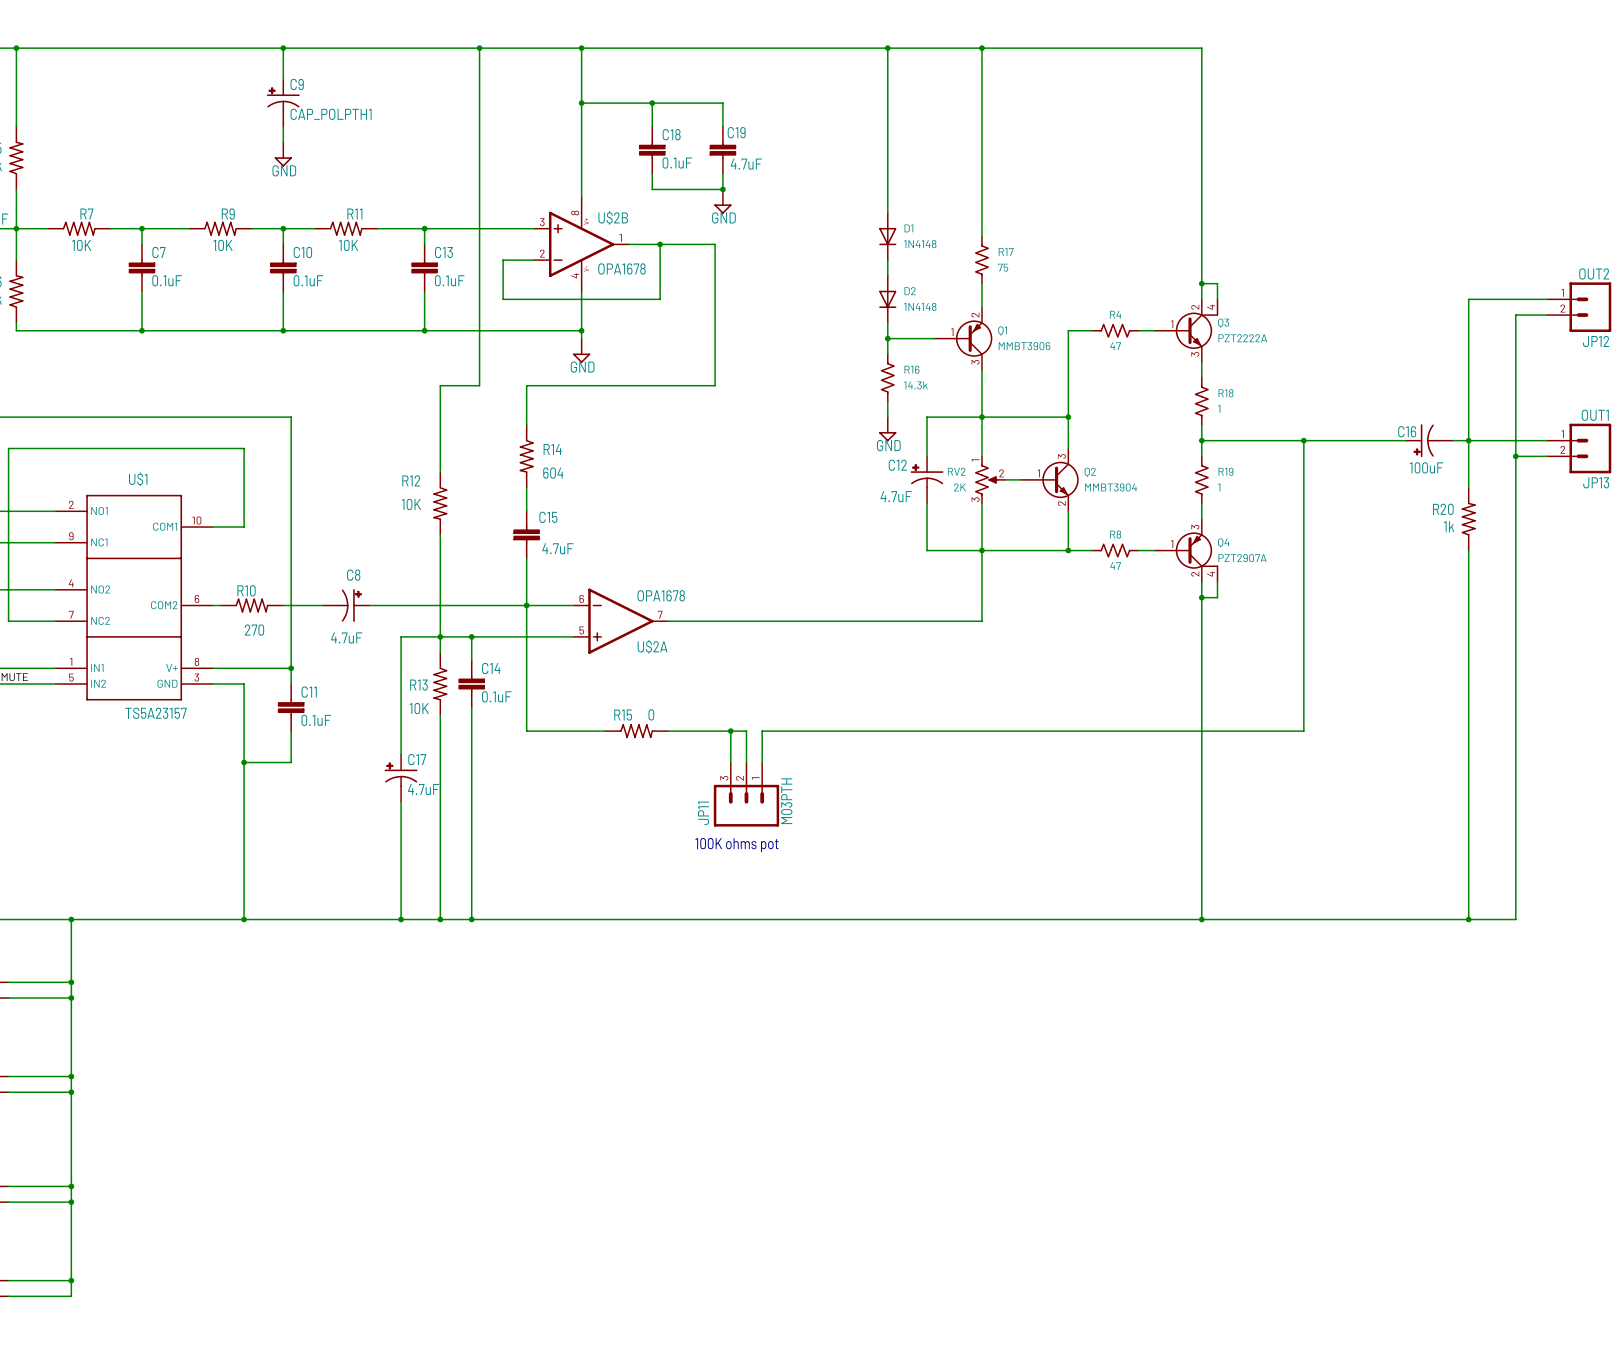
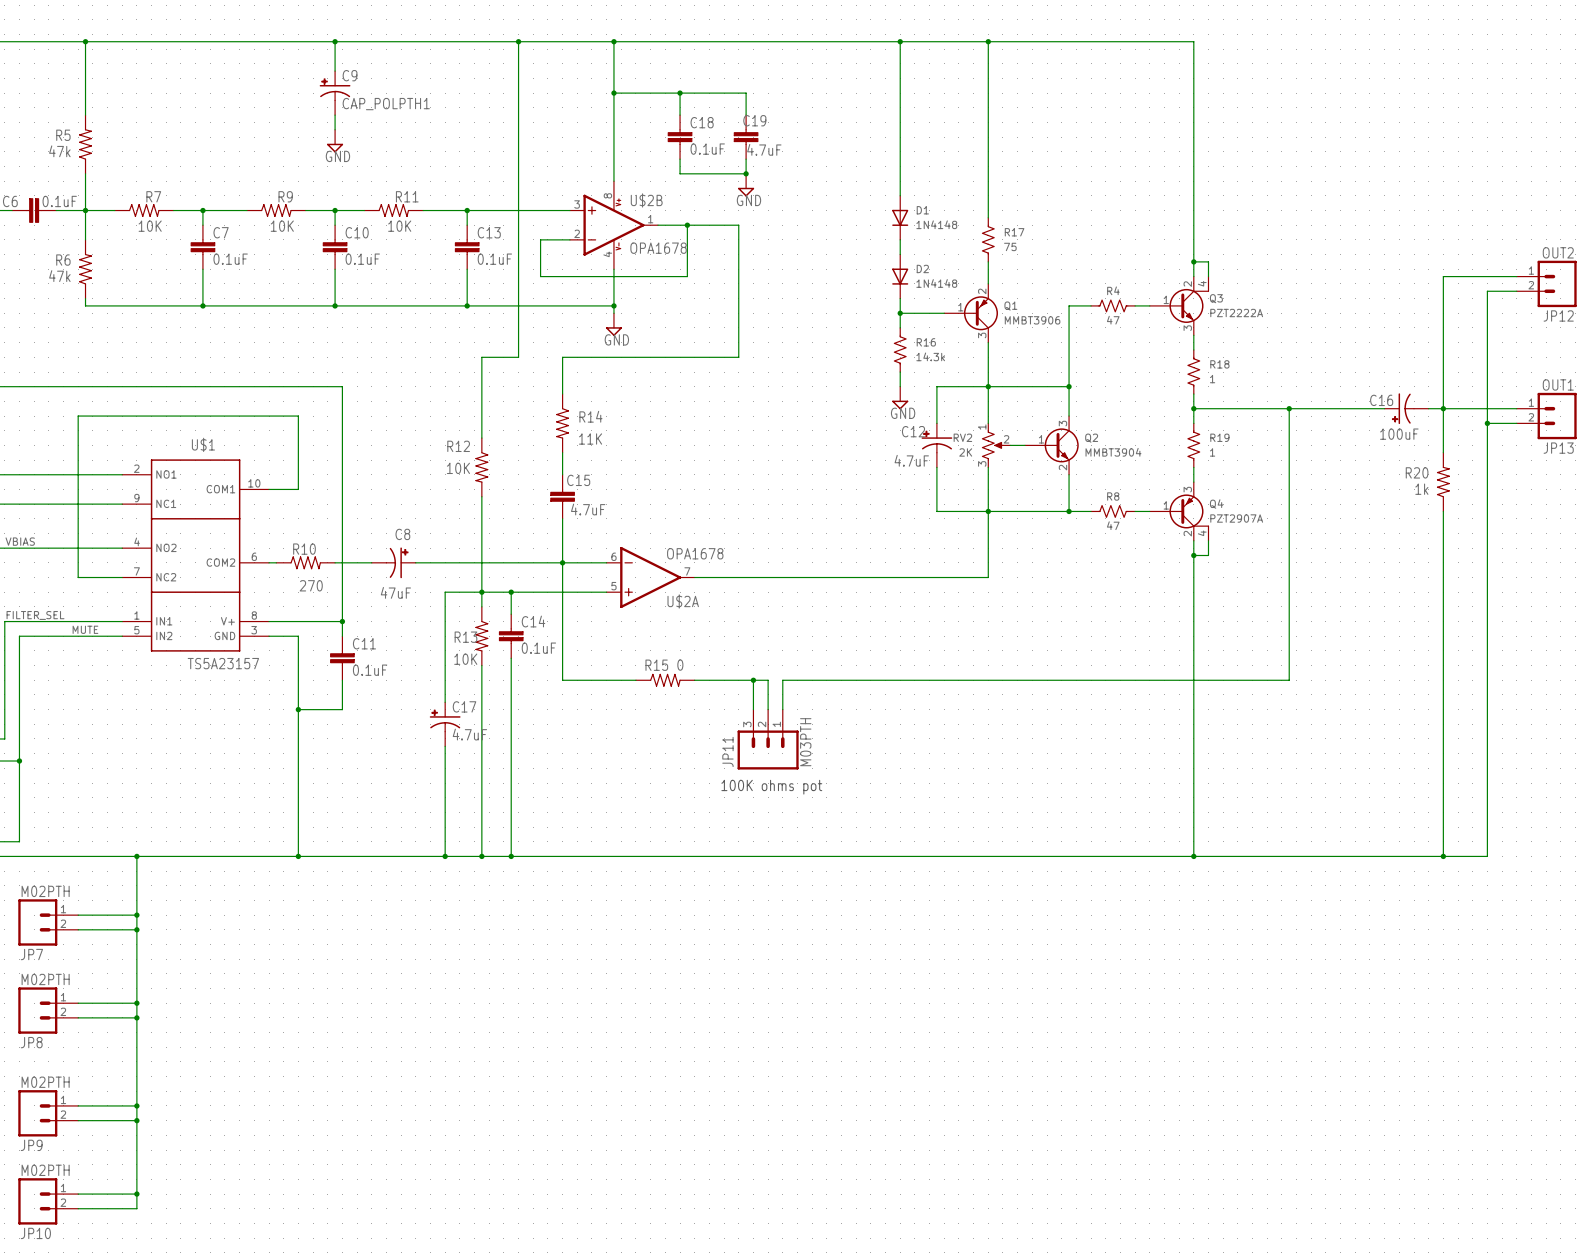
R14 value: 604 (553, 473) -> 11K (590, 439)
C8 value: 4.7uF (346, 637) -> 47uF (395, 592)

